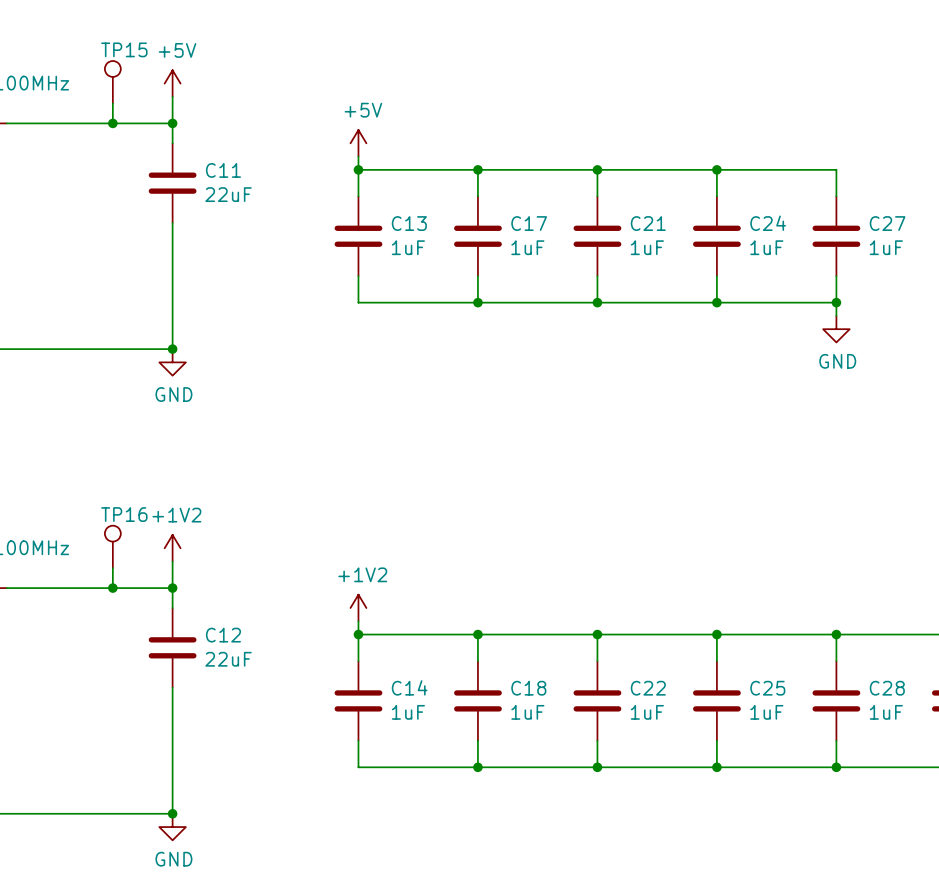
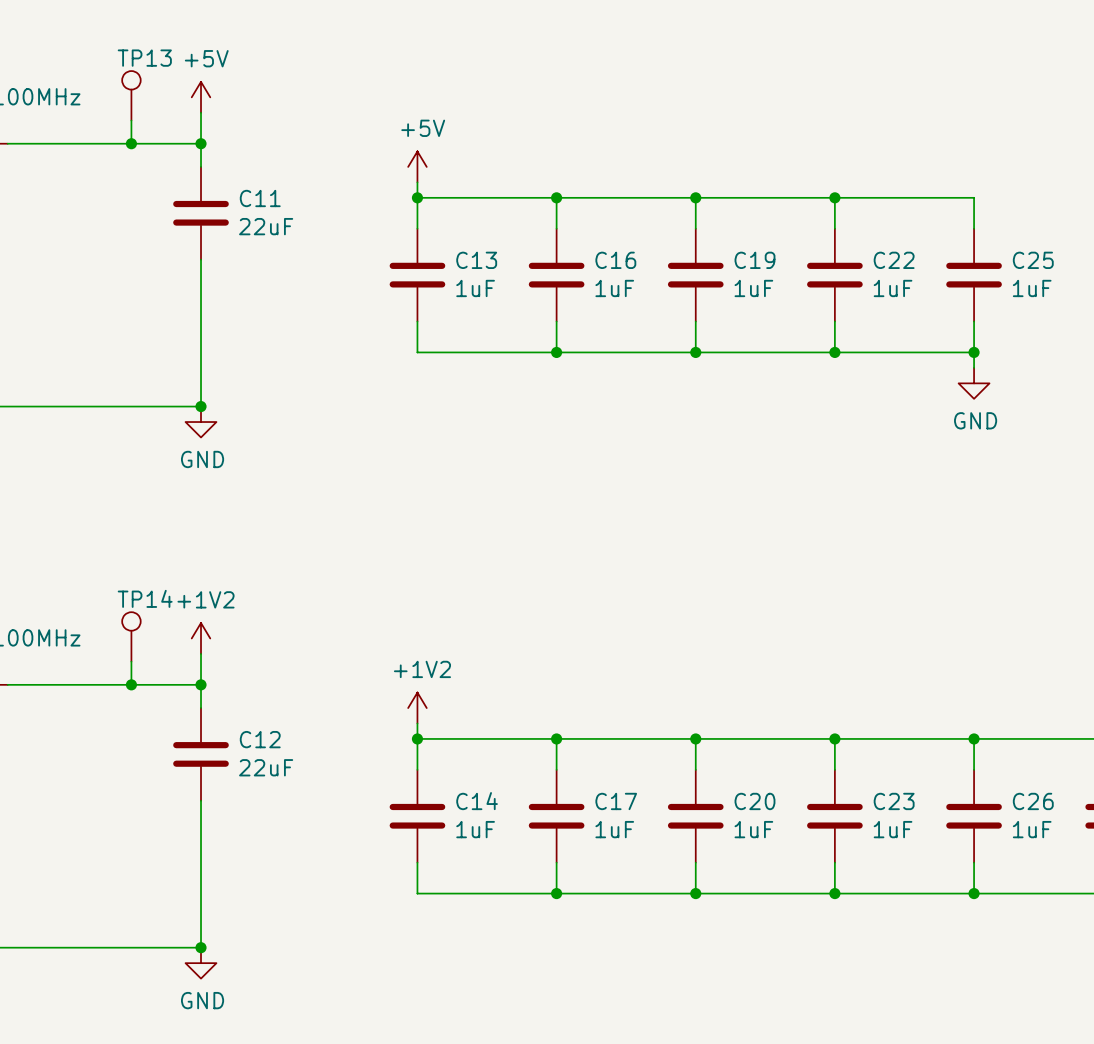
TP15 name: TP15 (124, 49) -> TP13 (144, 58)
C17 name: C17 (529, 223) -> C16 (615, 260)
C21 name: C21 (648, 223) -> C19 (754, 260)
C24 name: C24 (768, 223) -> C22 (894, 260)
C27 name: C27 (887, 223) -> C25 (1033, 260)
TP16 name: TP16 (124, 514) -> TP14 (145, 598)
C18 name: C18 (528, 688) -> C17 (616, 801)
C22 name: C22 (648, 688) -> C20 (754, 801)
C25 name: C25 (767, 688) -> C23 (894, 801)
C28 name: C28 (887, 688) -> C26 (1033, 801)

